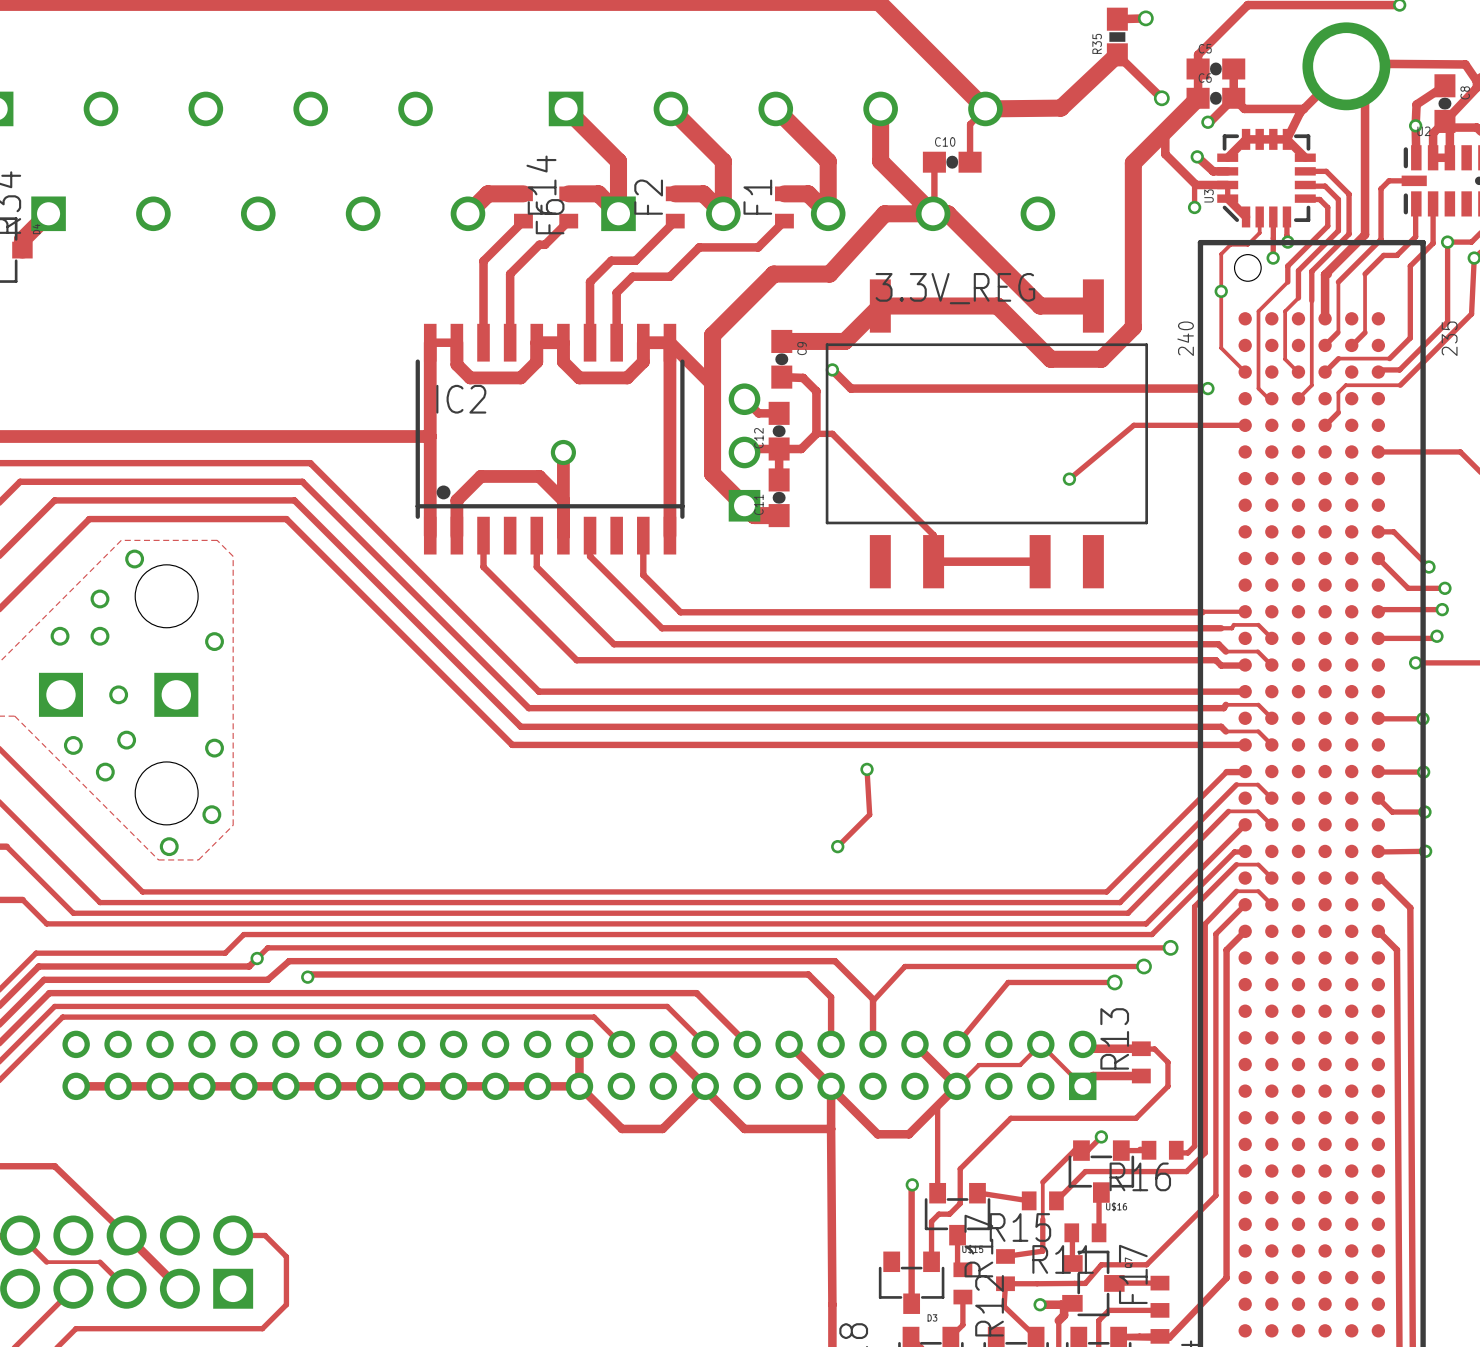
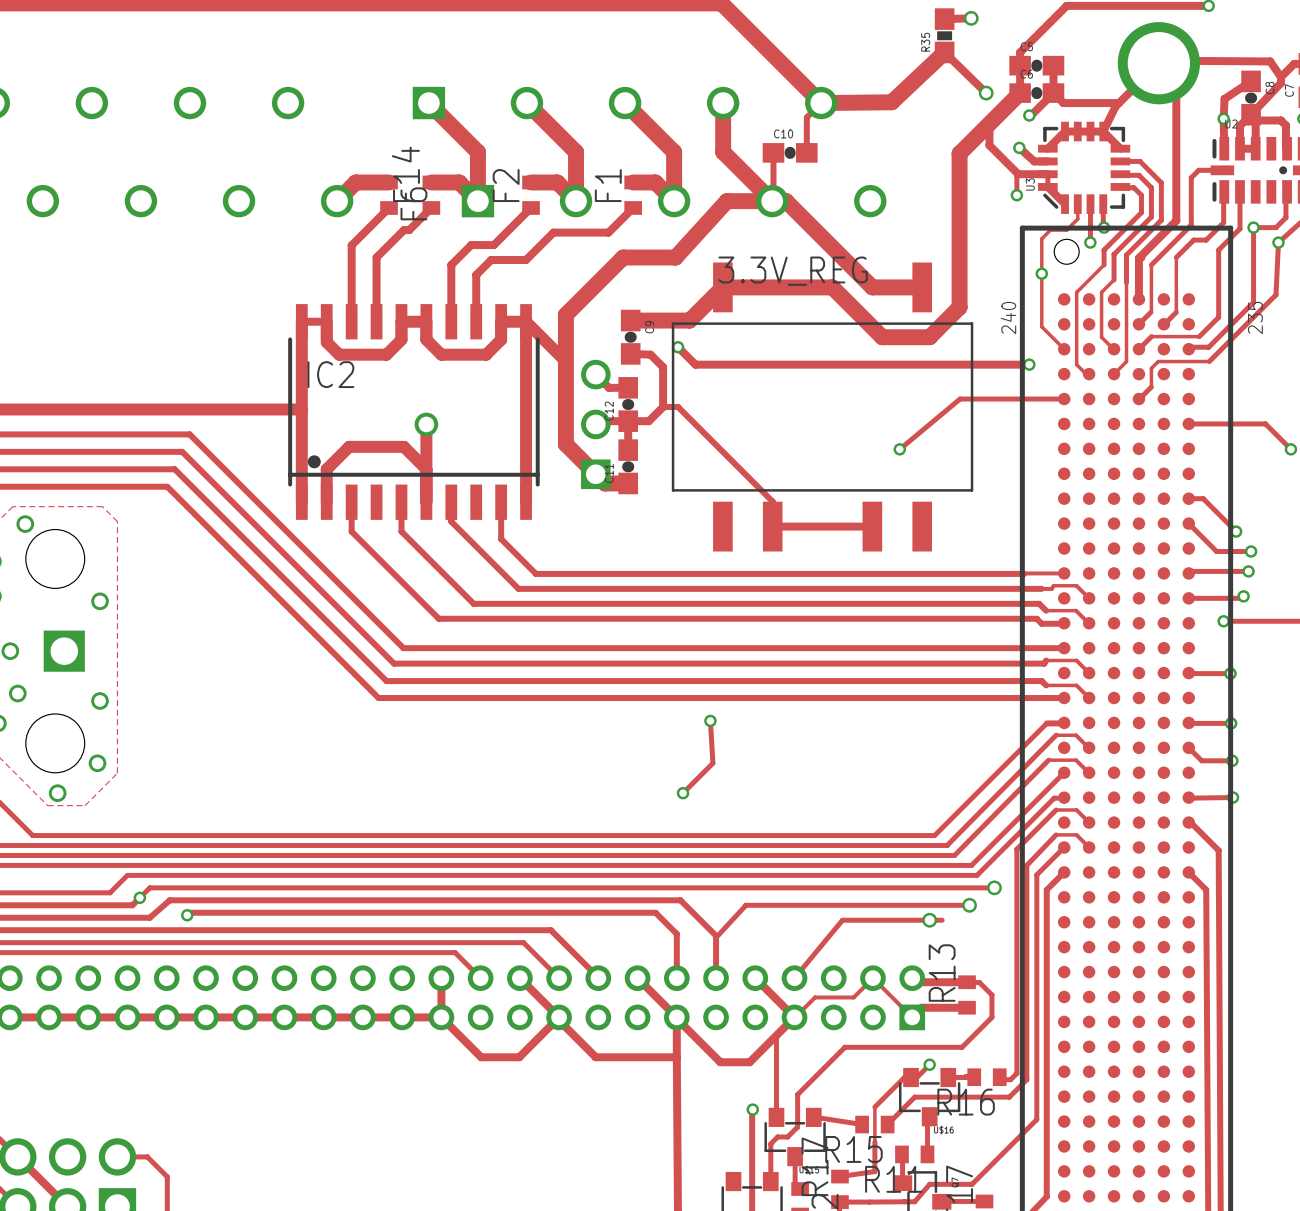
via position: (1114, 982) -> (929, 920)

